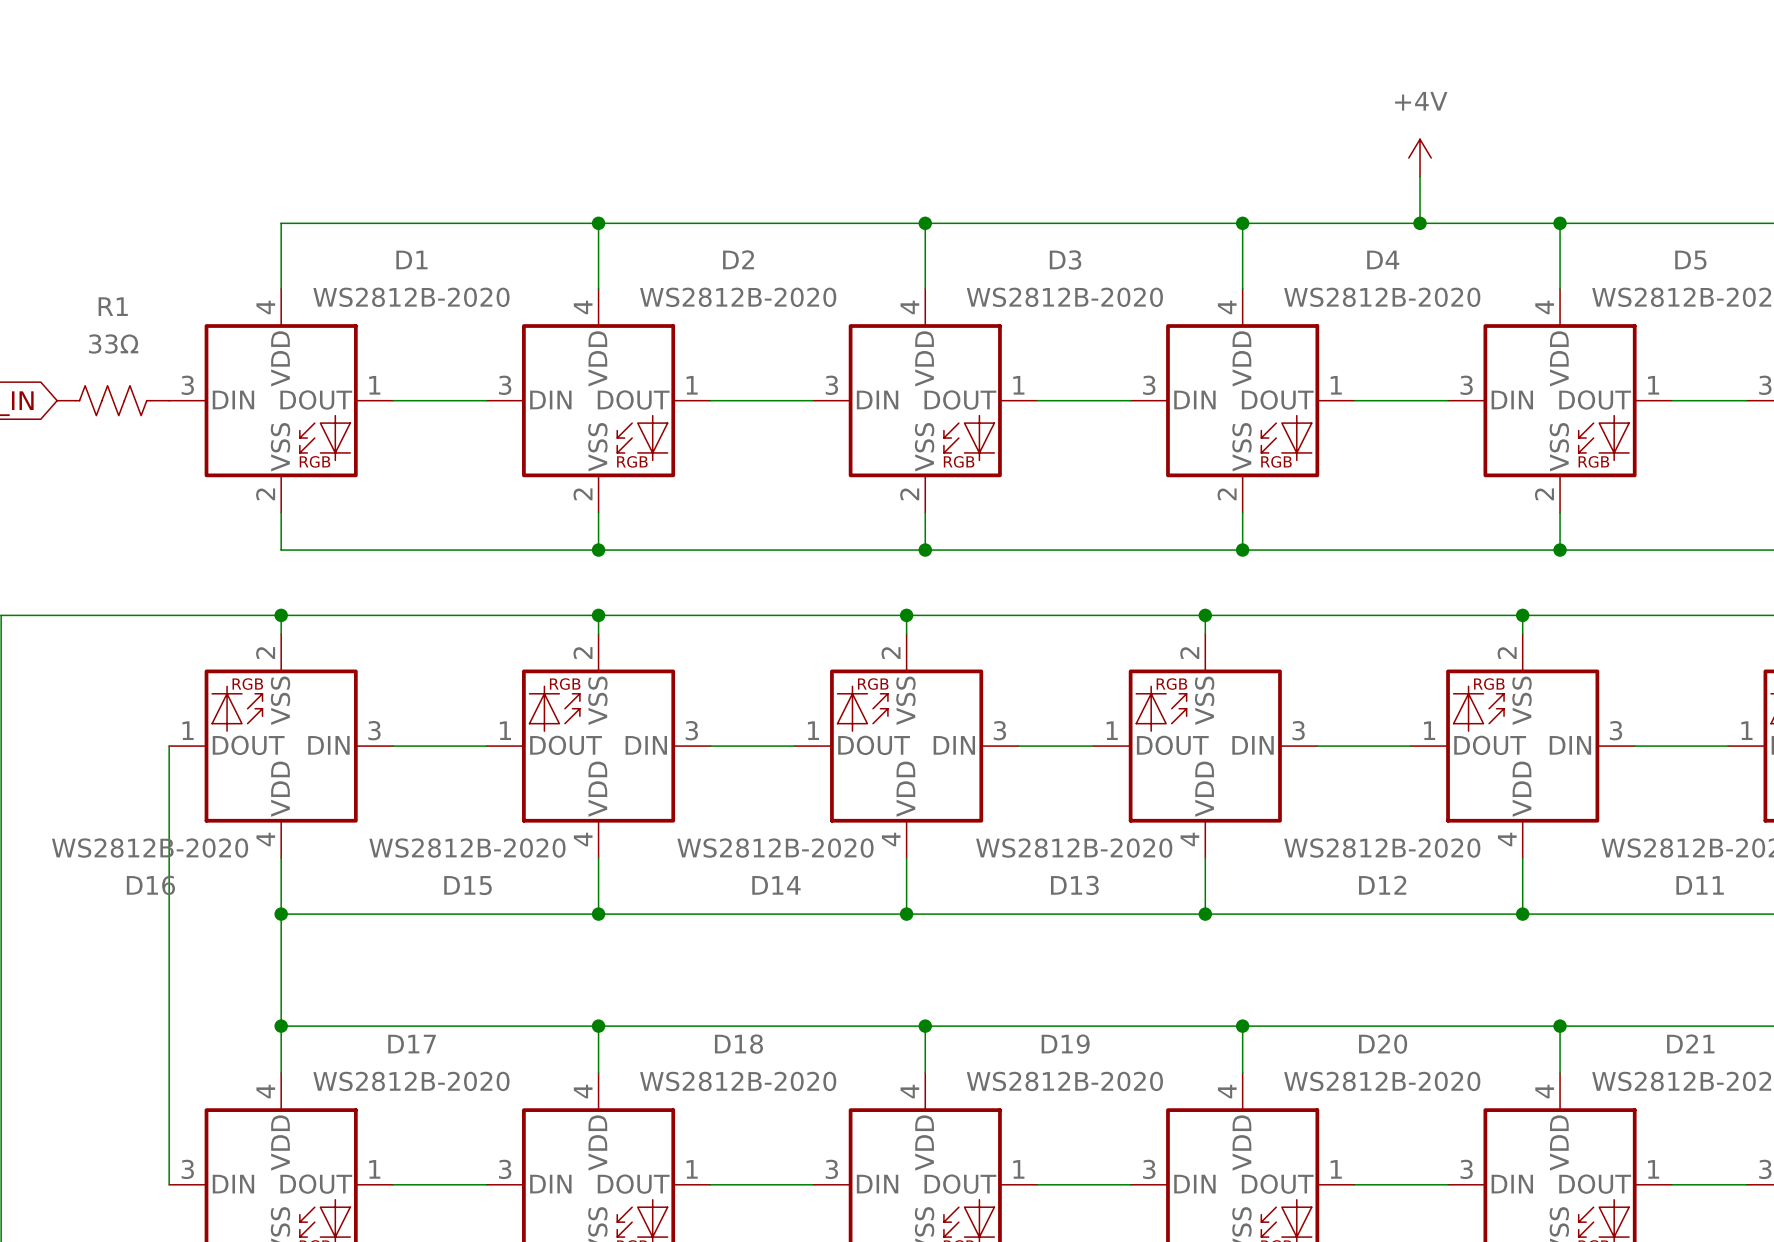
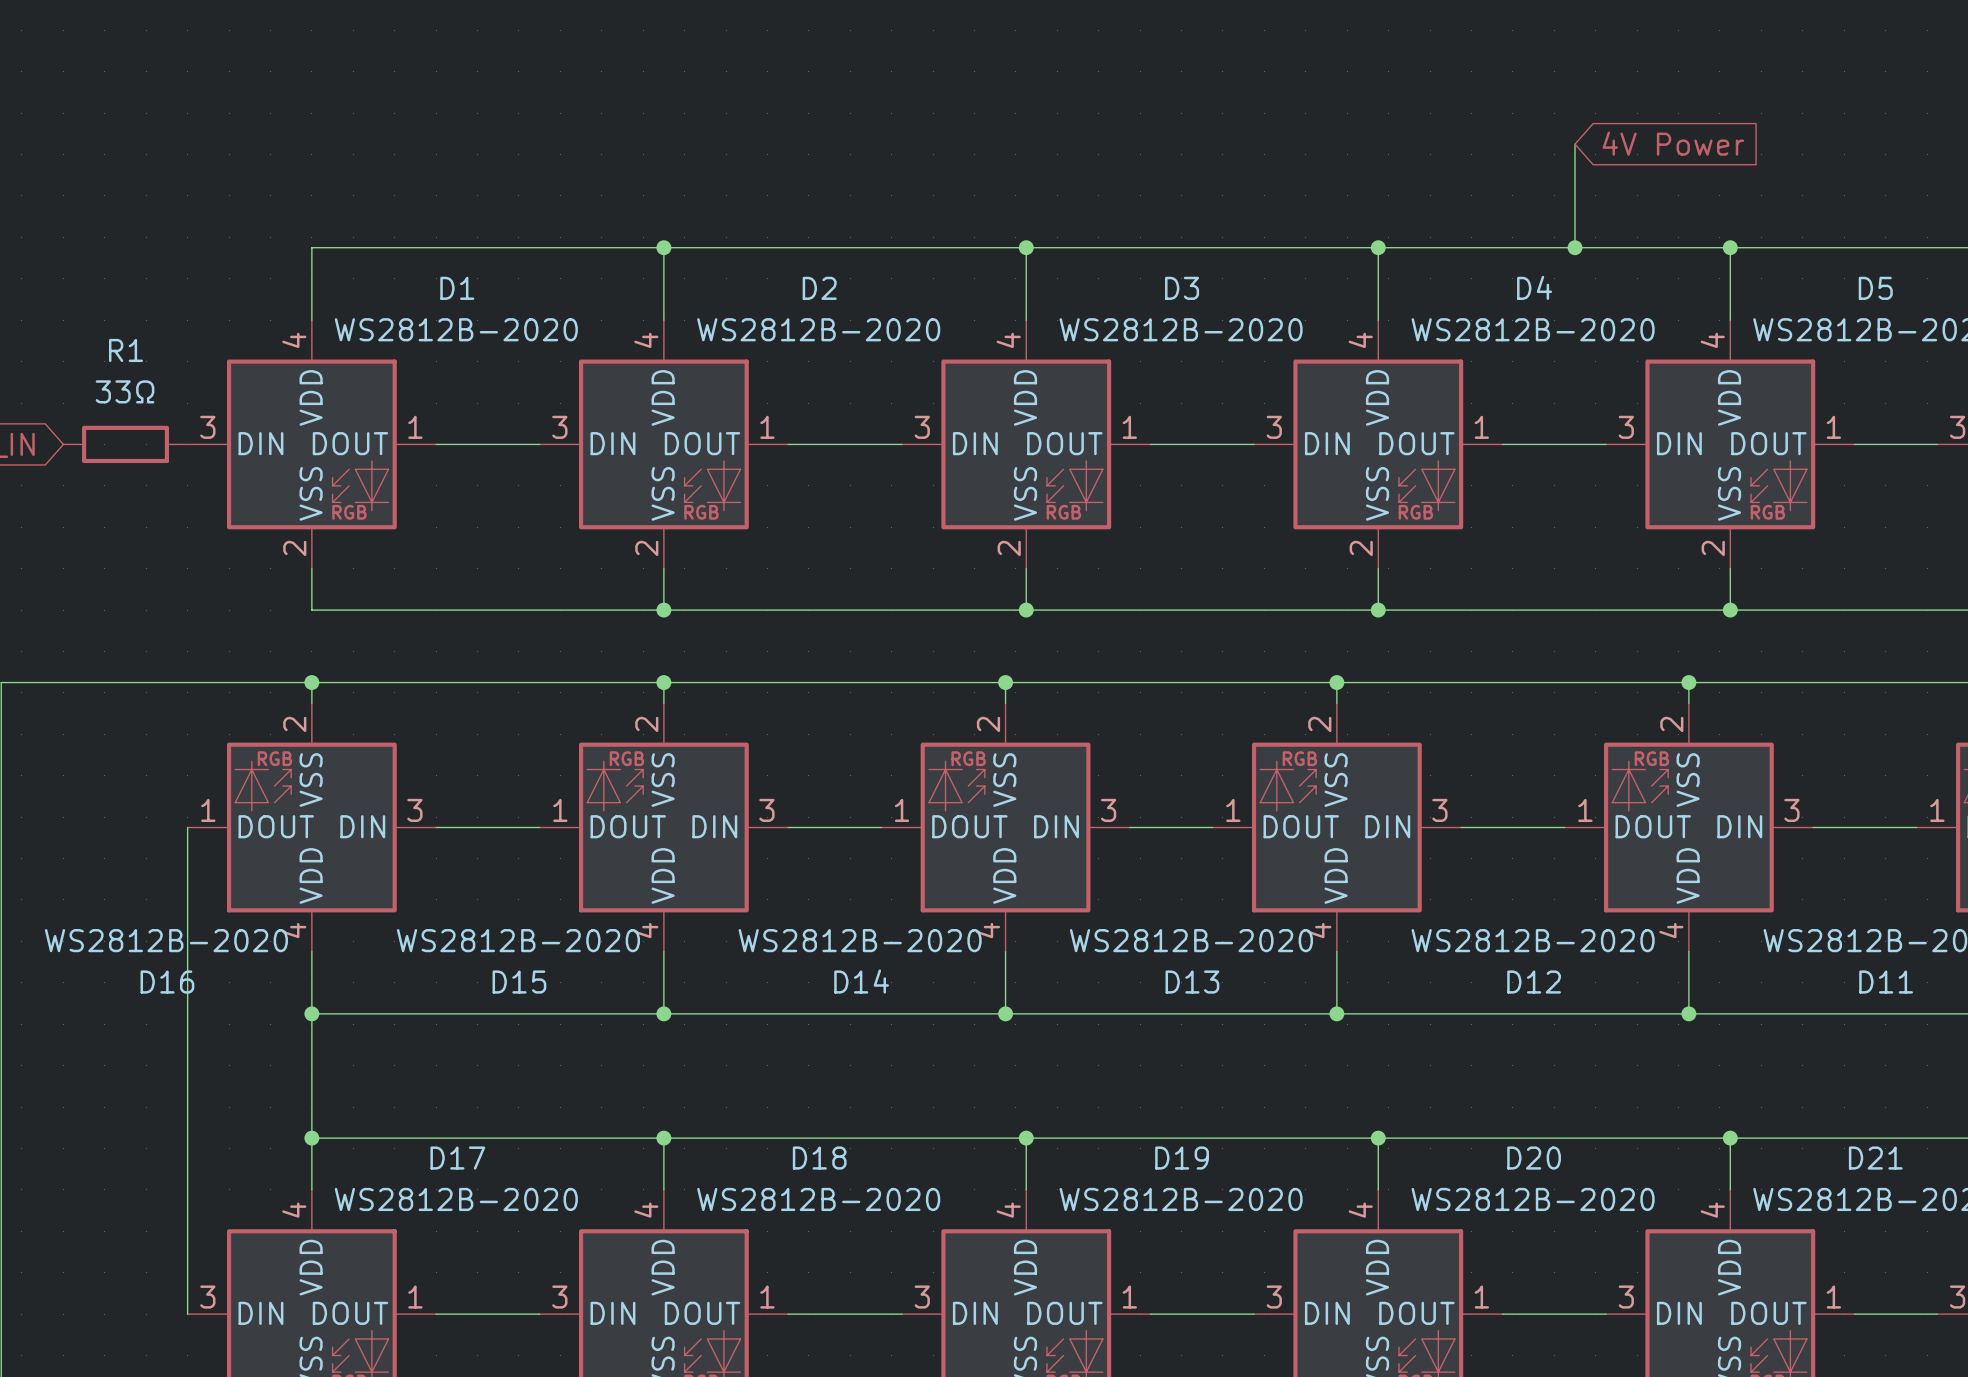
global label: none -> 4V Power (1673, 143)
power symbol: +4V (1420, 157) -> none
R1 symbol: [57, 385, 170, 416] -> [63, 425, 188, 464]

